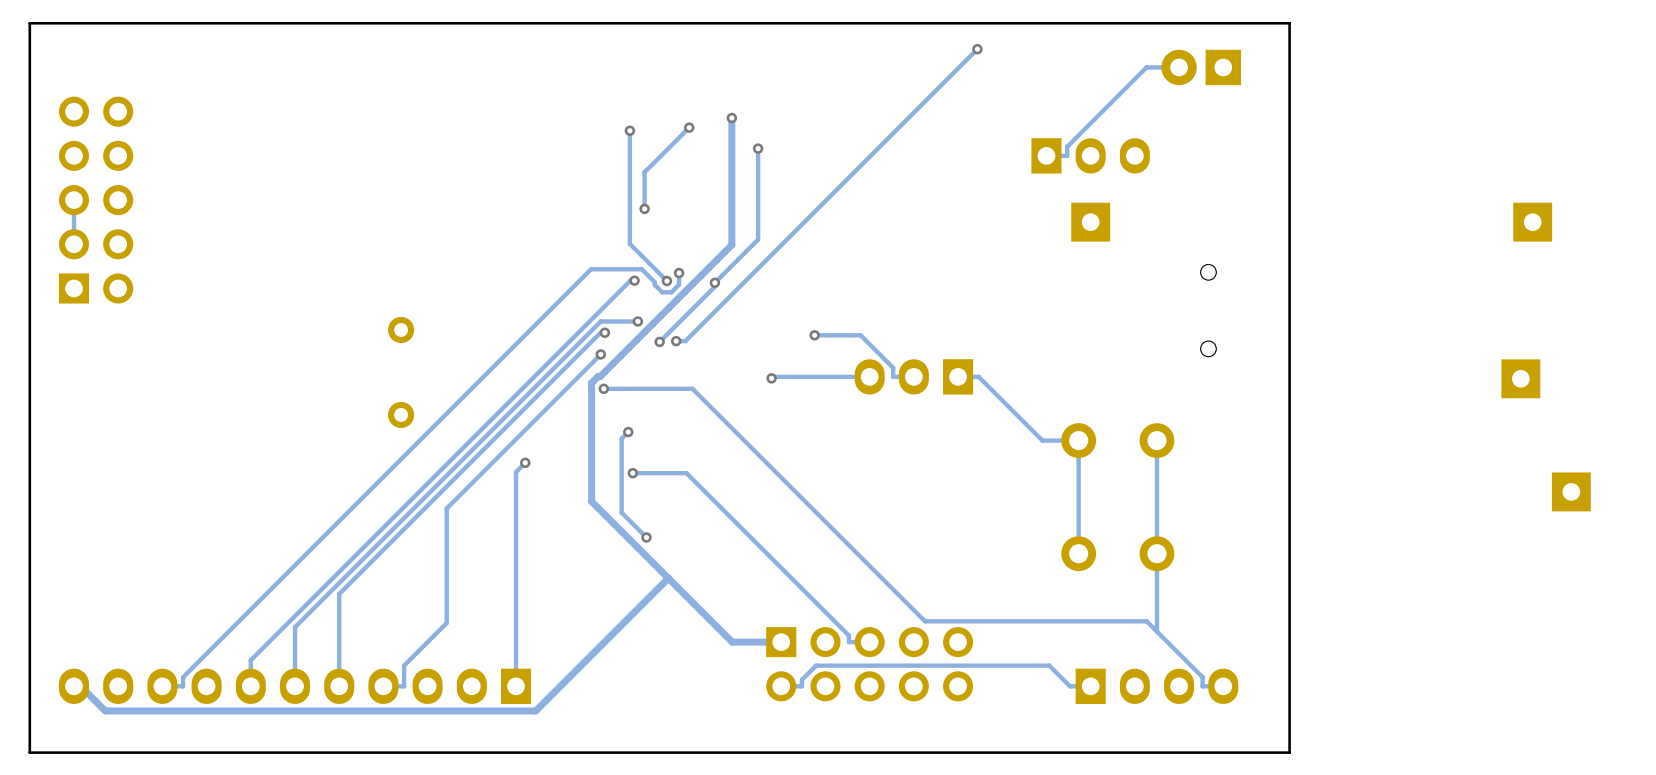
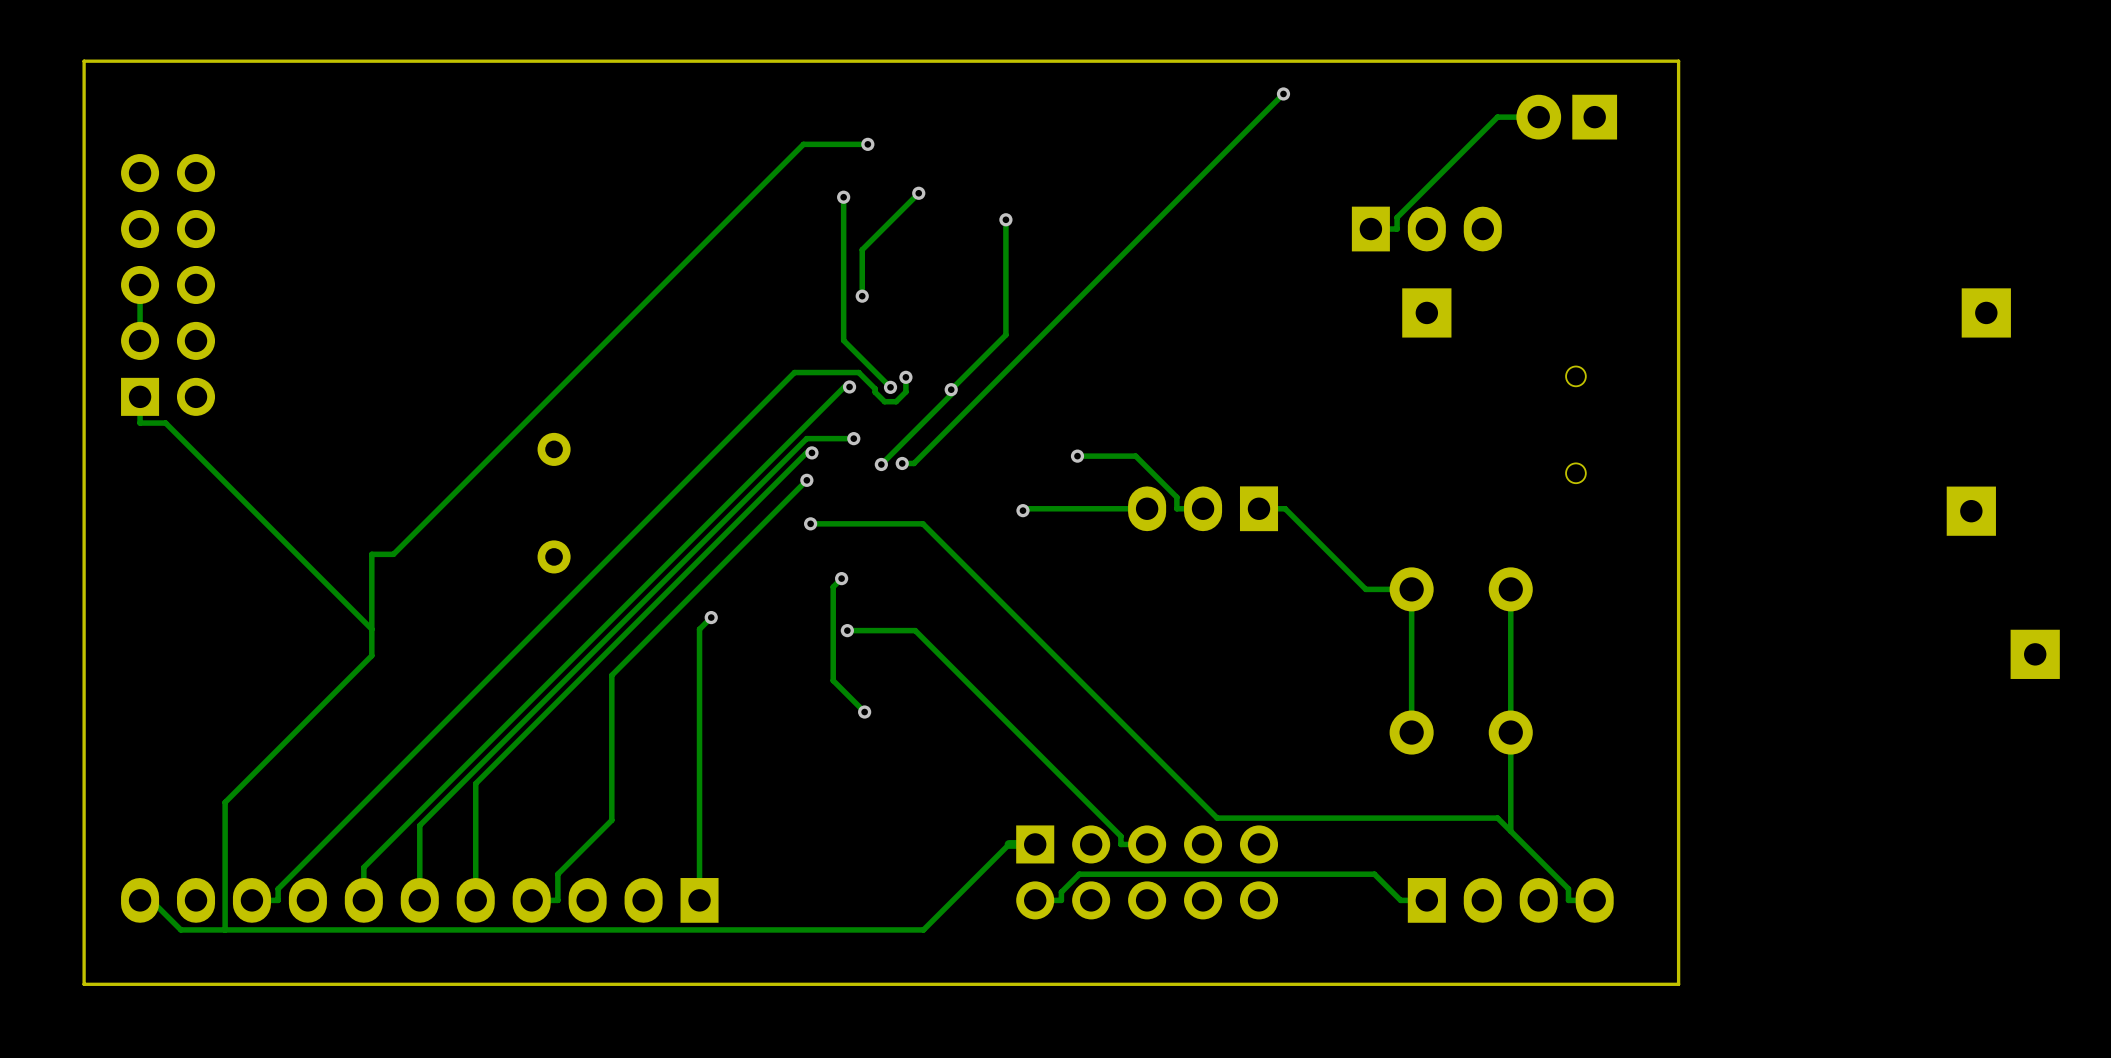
track: none -> (867, 144) (803, 144) (393, 554) (371, 554) (371, 655) (225, 802) (225, 929)
track: (731, 118) (731, 244) (591, 383) (591, 501) (732, 642) (760, 642) -> (151, 900) (180, 929) (923, 929) (1009, 844)
via position: (731, 118) -> (867, 144)
track: none -> (140, 396) (140, 423) (165, 423) (371, 629)
track: (668, 578) (535, 710) (105, 710) (80, 686) -> none

